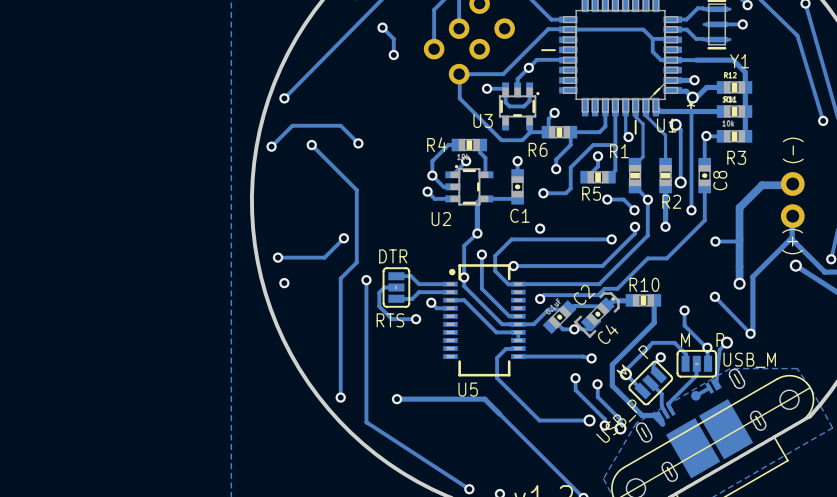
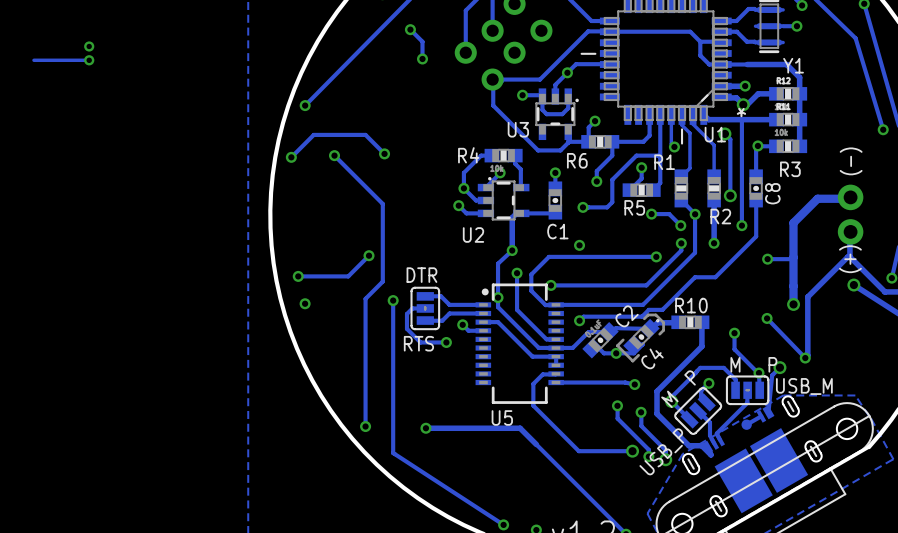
via: none -> (89, 46)
track: none -> (89, 60) (33, 60)
via: none -> (89, 60)

